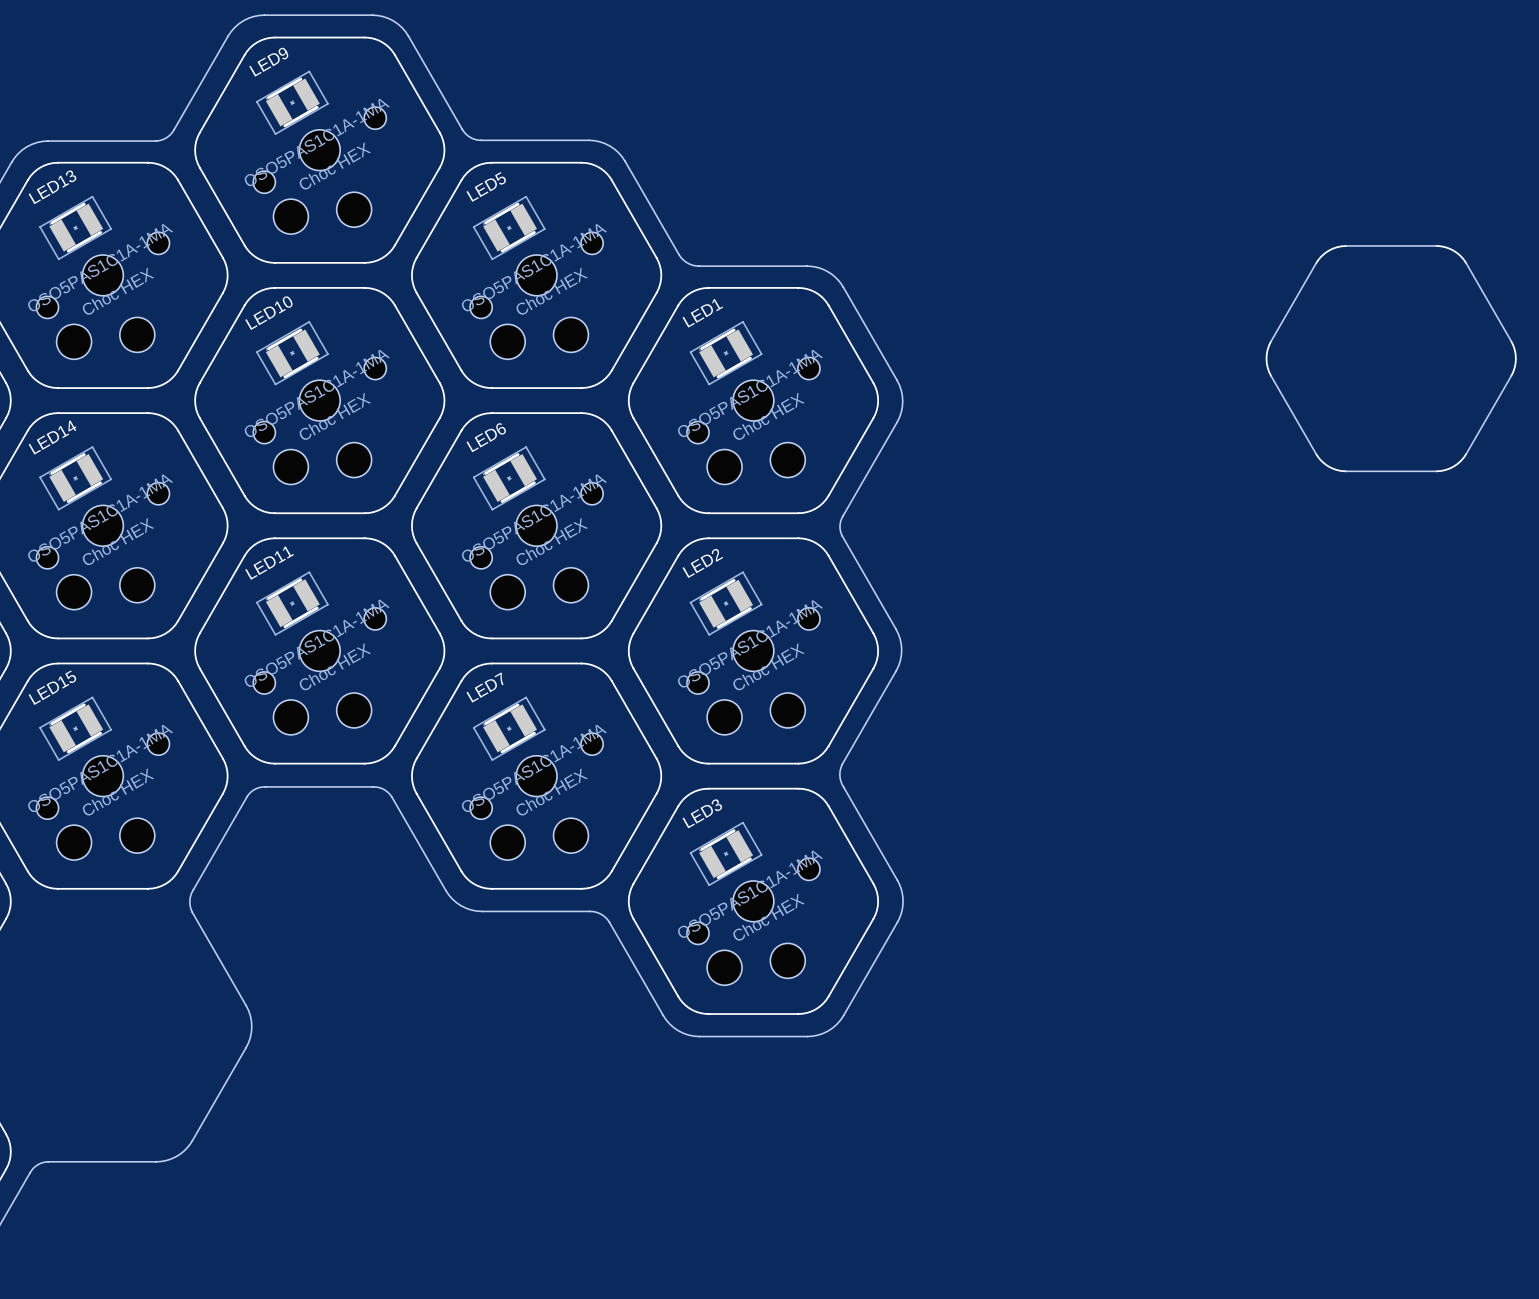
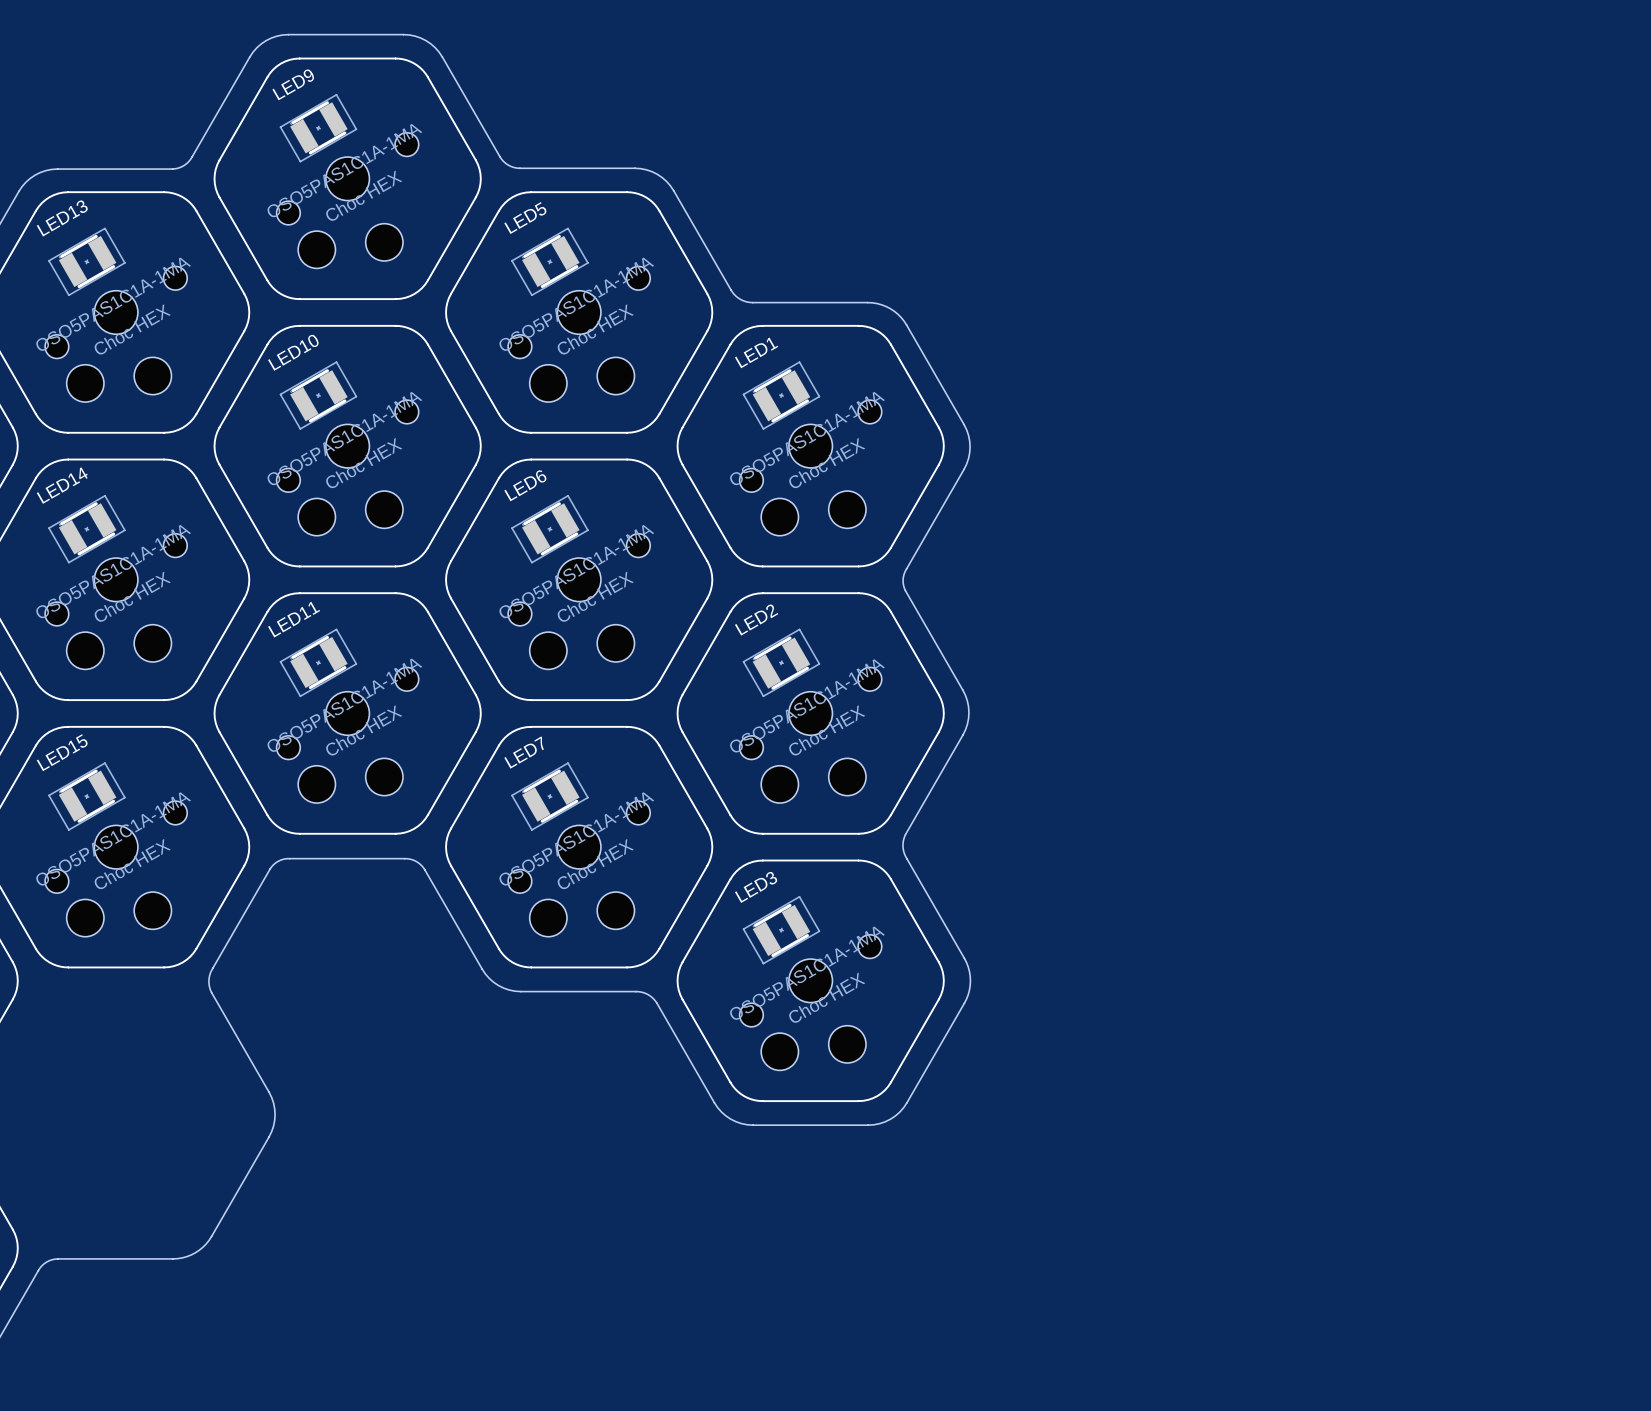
drawing: [1265, 245, 1517, 473] -> none

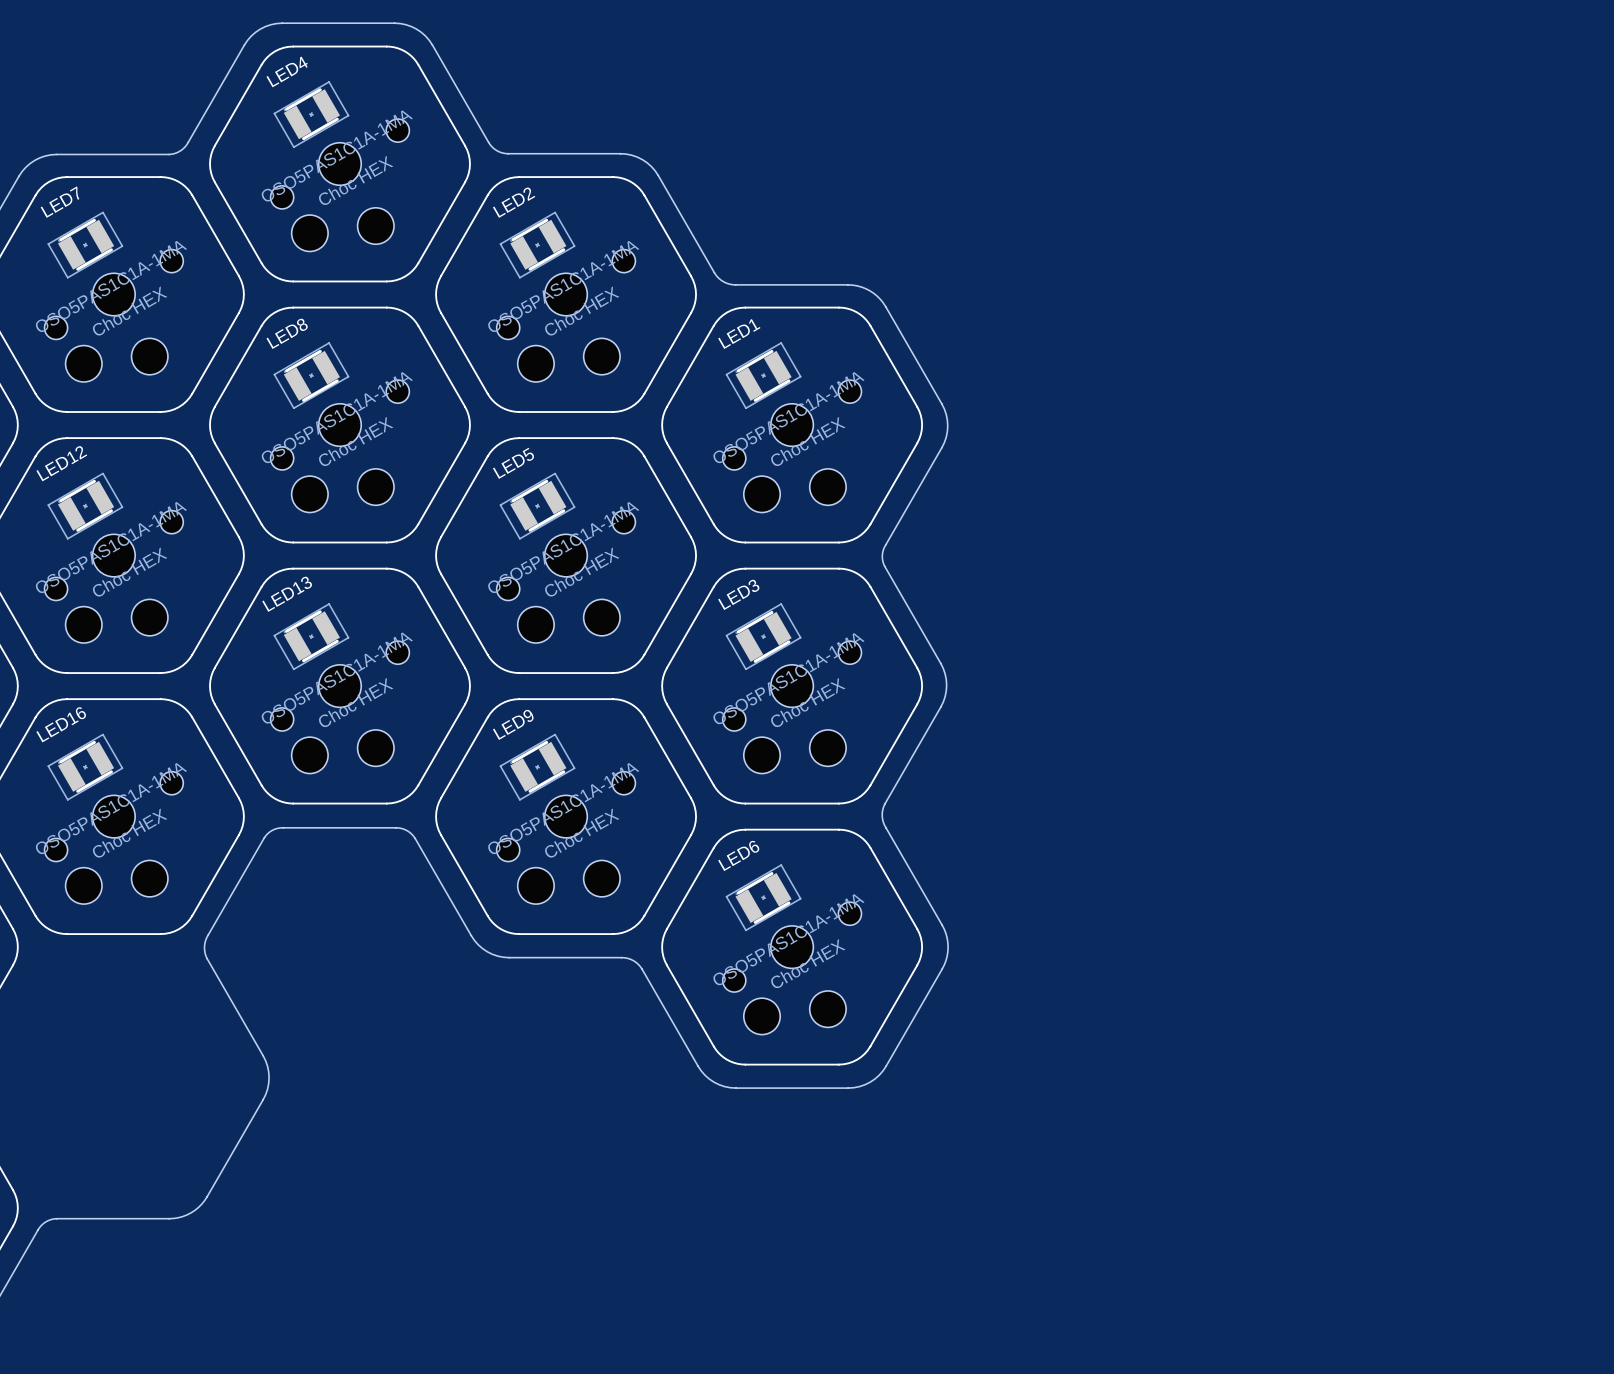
LED9 name: LED9 (293, 84) -> LED4 (287, 71)
LED13 name: LED13 (62, 218) -> LED7 (60, 202)
LED5 name: LED5 (525, 218) -> LED2 (514, 202)
LED10 name: LED10 (293, 352) -> LED8 (287, 333)
LED14 name: LED14 (62, 485) -> LED12 (61, 463)
LED6 name: LED6 (525, 485) -> LED5 (513, 463)
LED11 name: LED11 (294, 619) -> LED13 (287, 594)
LED2 name: LED2 (756, 619) -> LED3 (738, 594)
LED15 name: LED15 (62, 752) -> LED16 (61, 724)
LED7 name: LED7 (524, 752) -> LED9 (513, 724)
LED3 name: LED3 (756, 887) -> LED6 (738, 855)

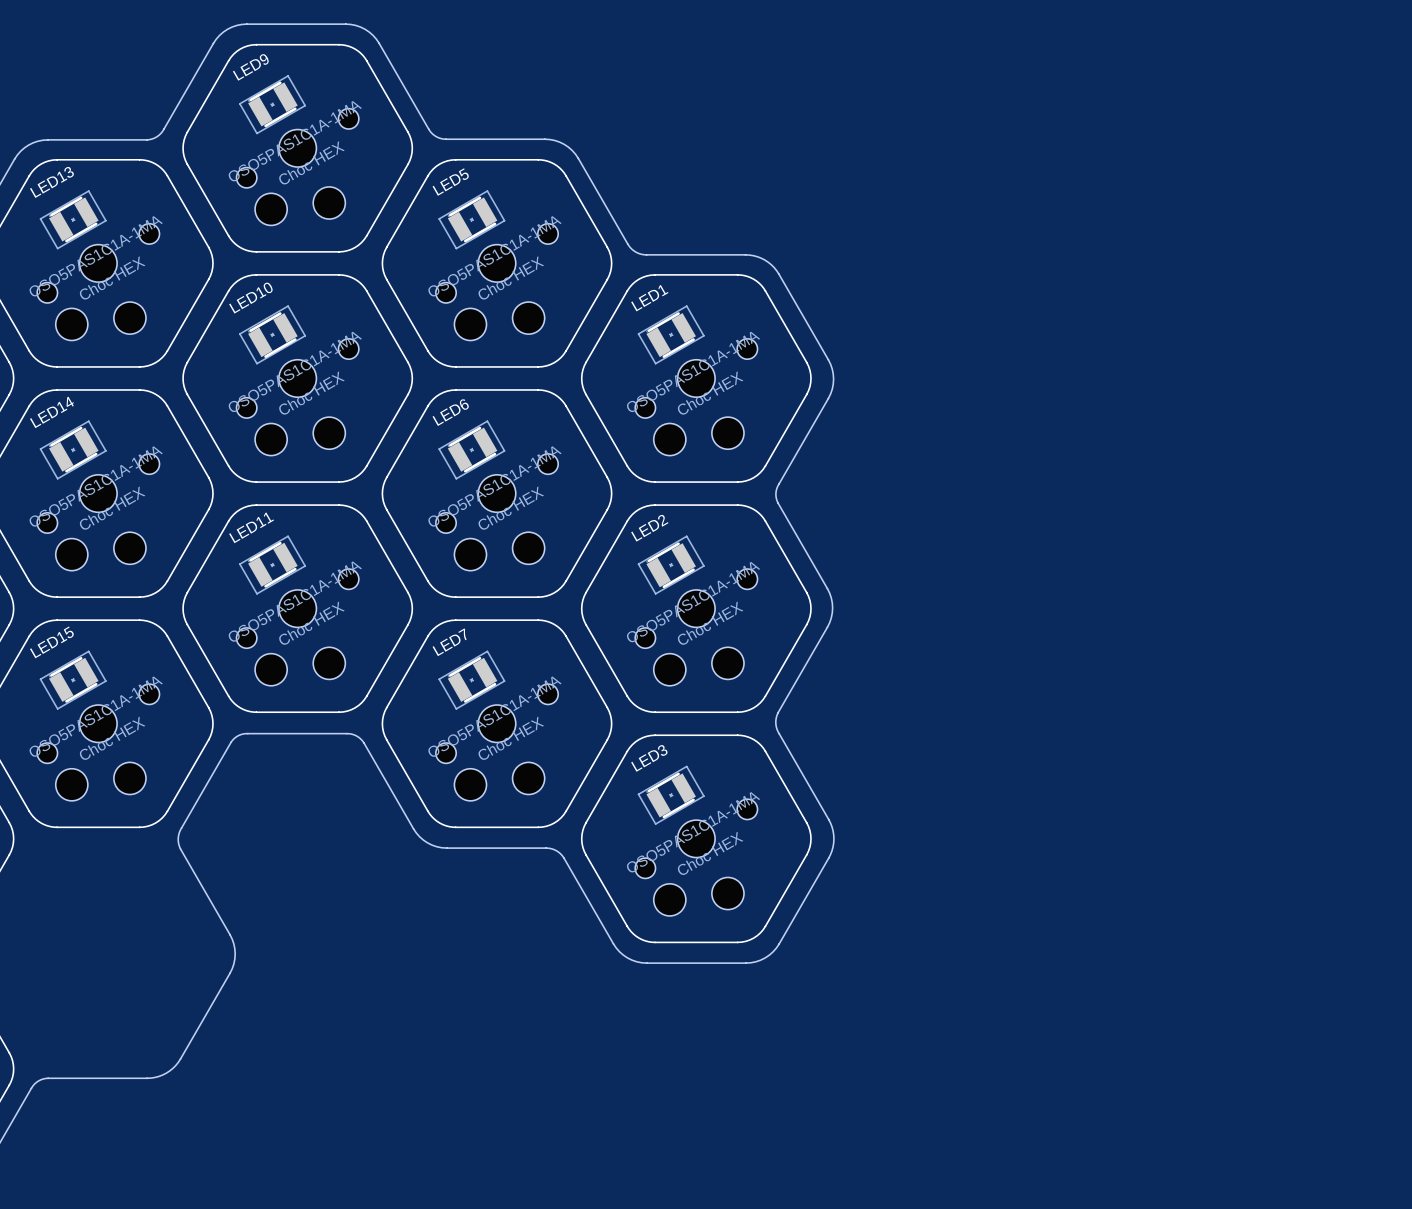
LED4 name: LED4 (287, 71) -> LED9 (250, 67)
LED7 name: LED7 (60, 202) -> LED13 (52, 182)
LED2 name: LED2 (514, 202) -> LED5 (450, 182)
LED8 name: LED8 (287, 333) -> LED10 (250, 297)
LED12 name: LED12 (61, 463) -> LED14 (51, 412)
LED5 name: LED5 (513, 463) -> LED6 (450, 412)
LED13 name: LED13 (287, 594) -> LED11 (251, 527)
LED3 name: LED3 (738, 594) -> LED2 (649, 528)
LED16 name: LED16 (61, 724) -> LED15 (52, 642)
LED9 name: LED9 (513, 724) -> LED7 (449, 642)
LED6 name: LED6 (738, 855) -> LED3 (649, 758)

